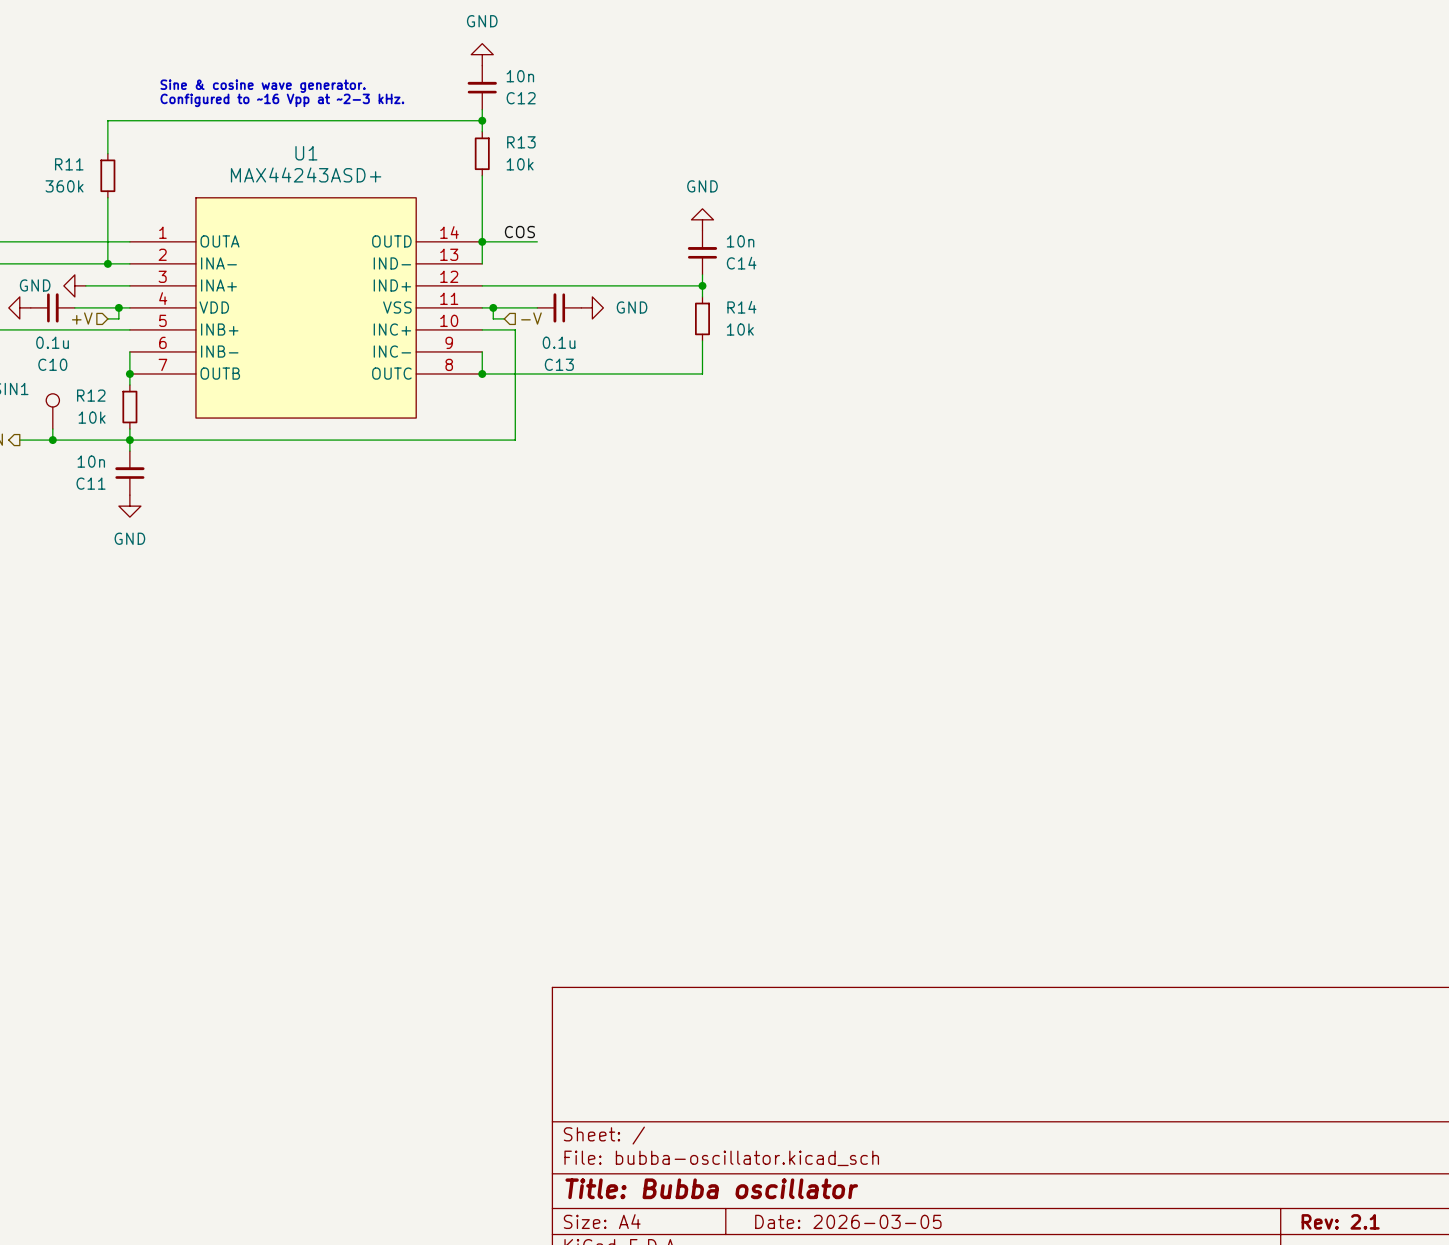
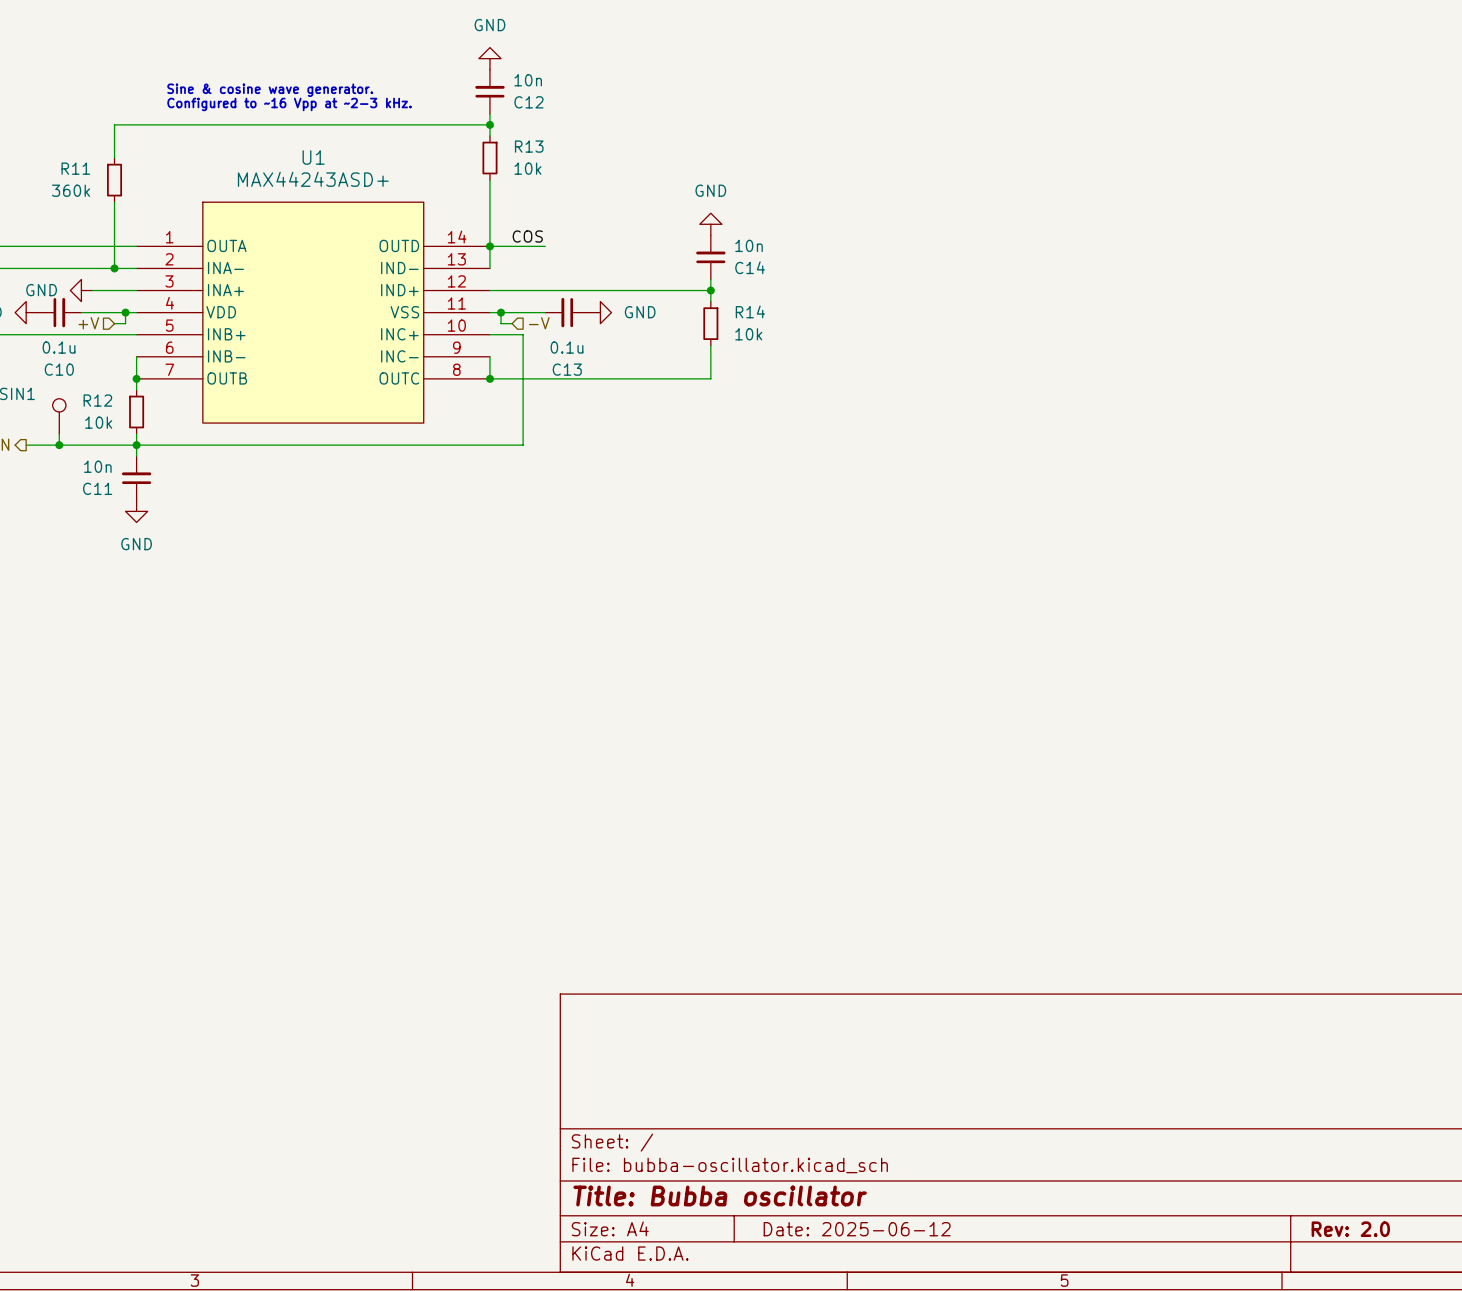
title block: Date: 2026-03-05 (848, 1221) -> Date: 2025-06-12 (857, 1229)
title block: Rev: 2.1 (1340, 1221) -> Rev: 2.0 (1350, 1229)

